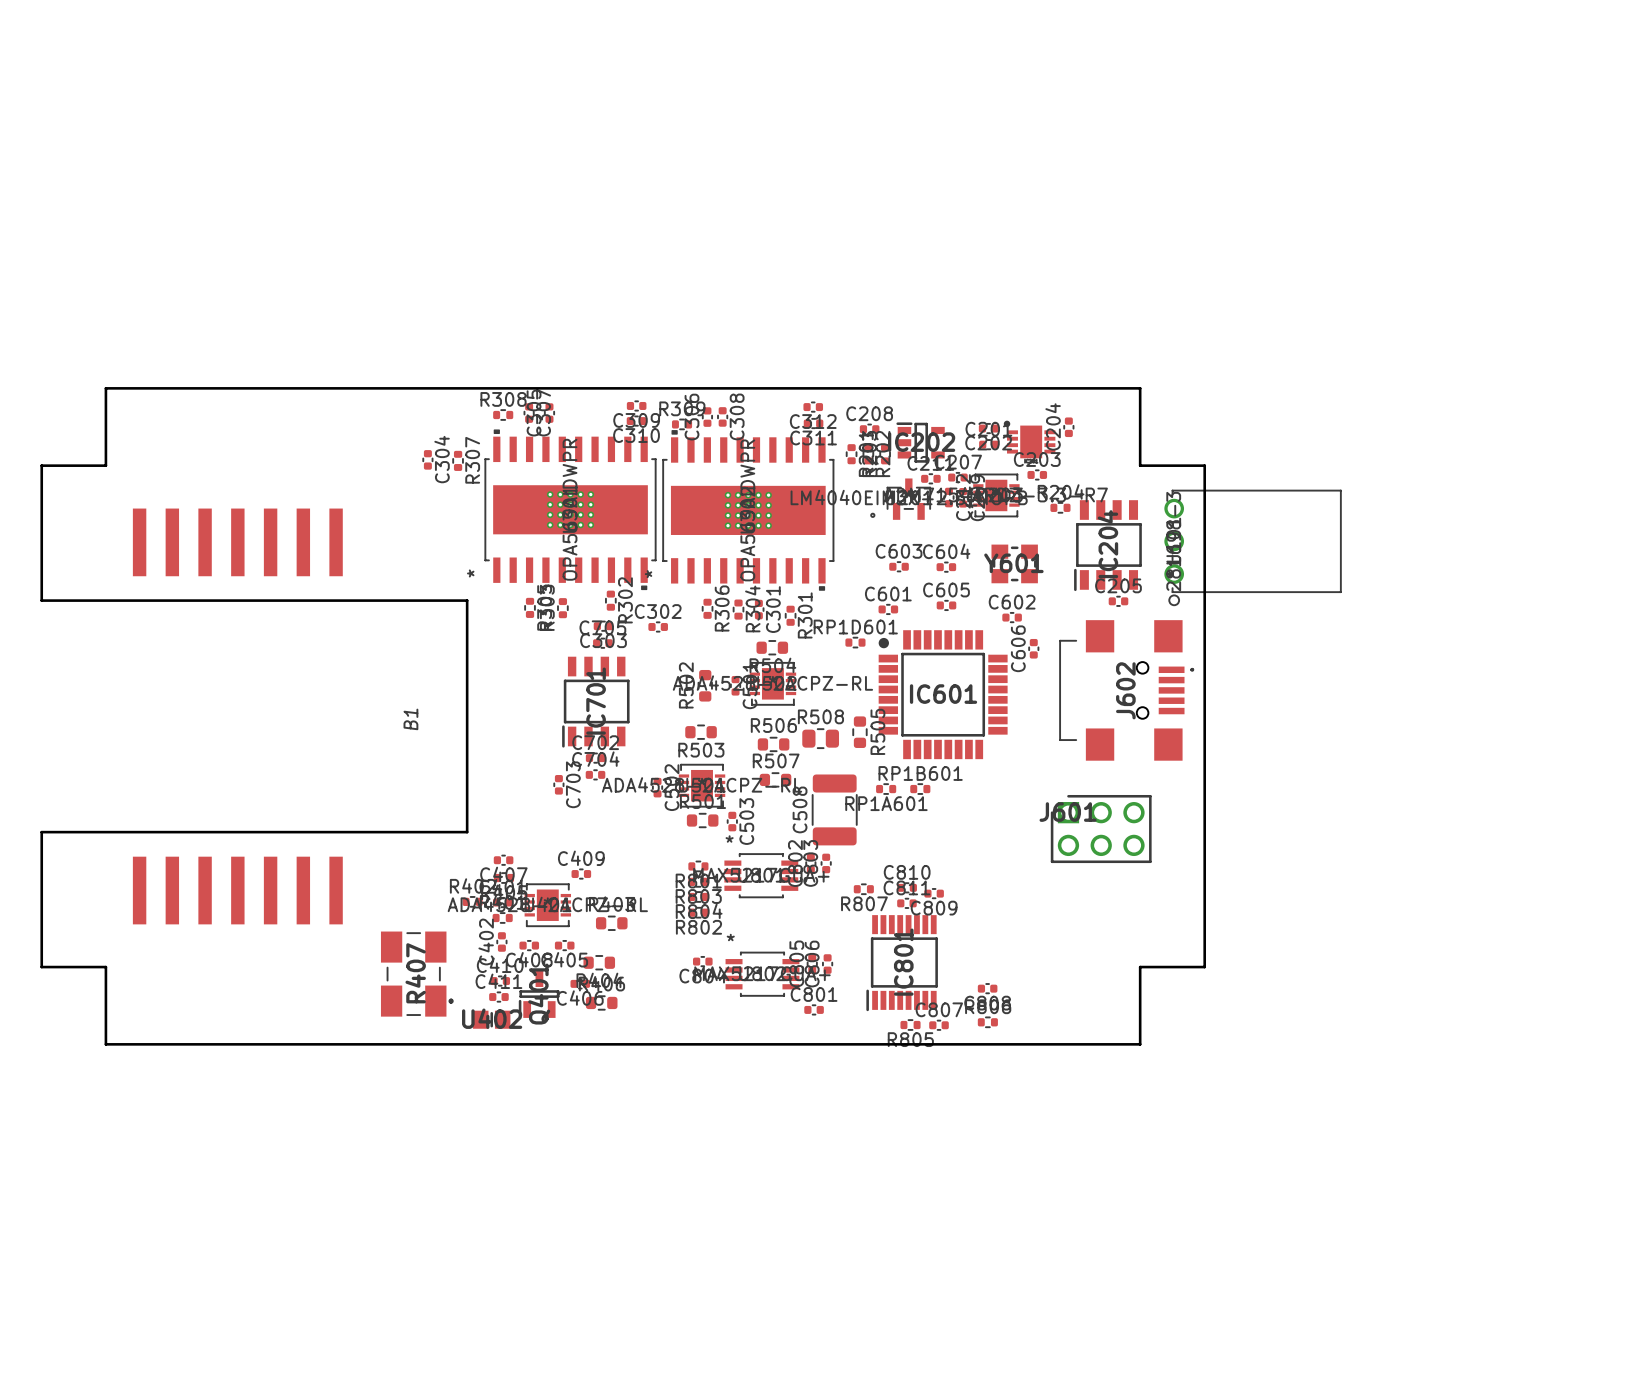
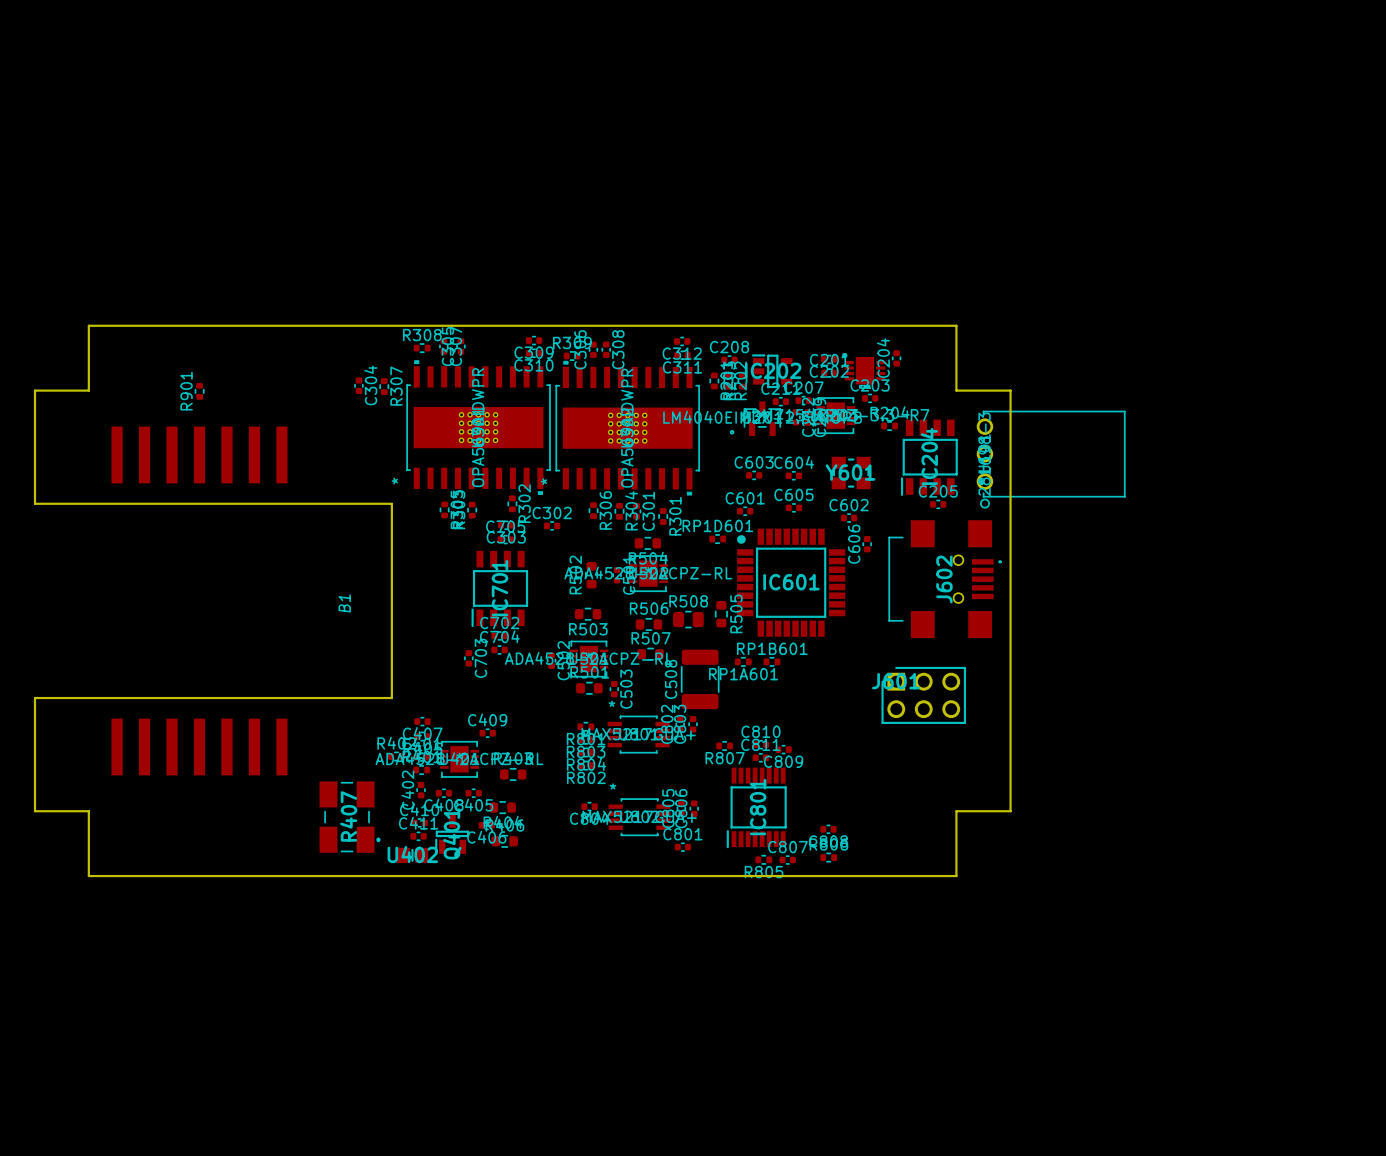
R901: none -> (199, 391)

